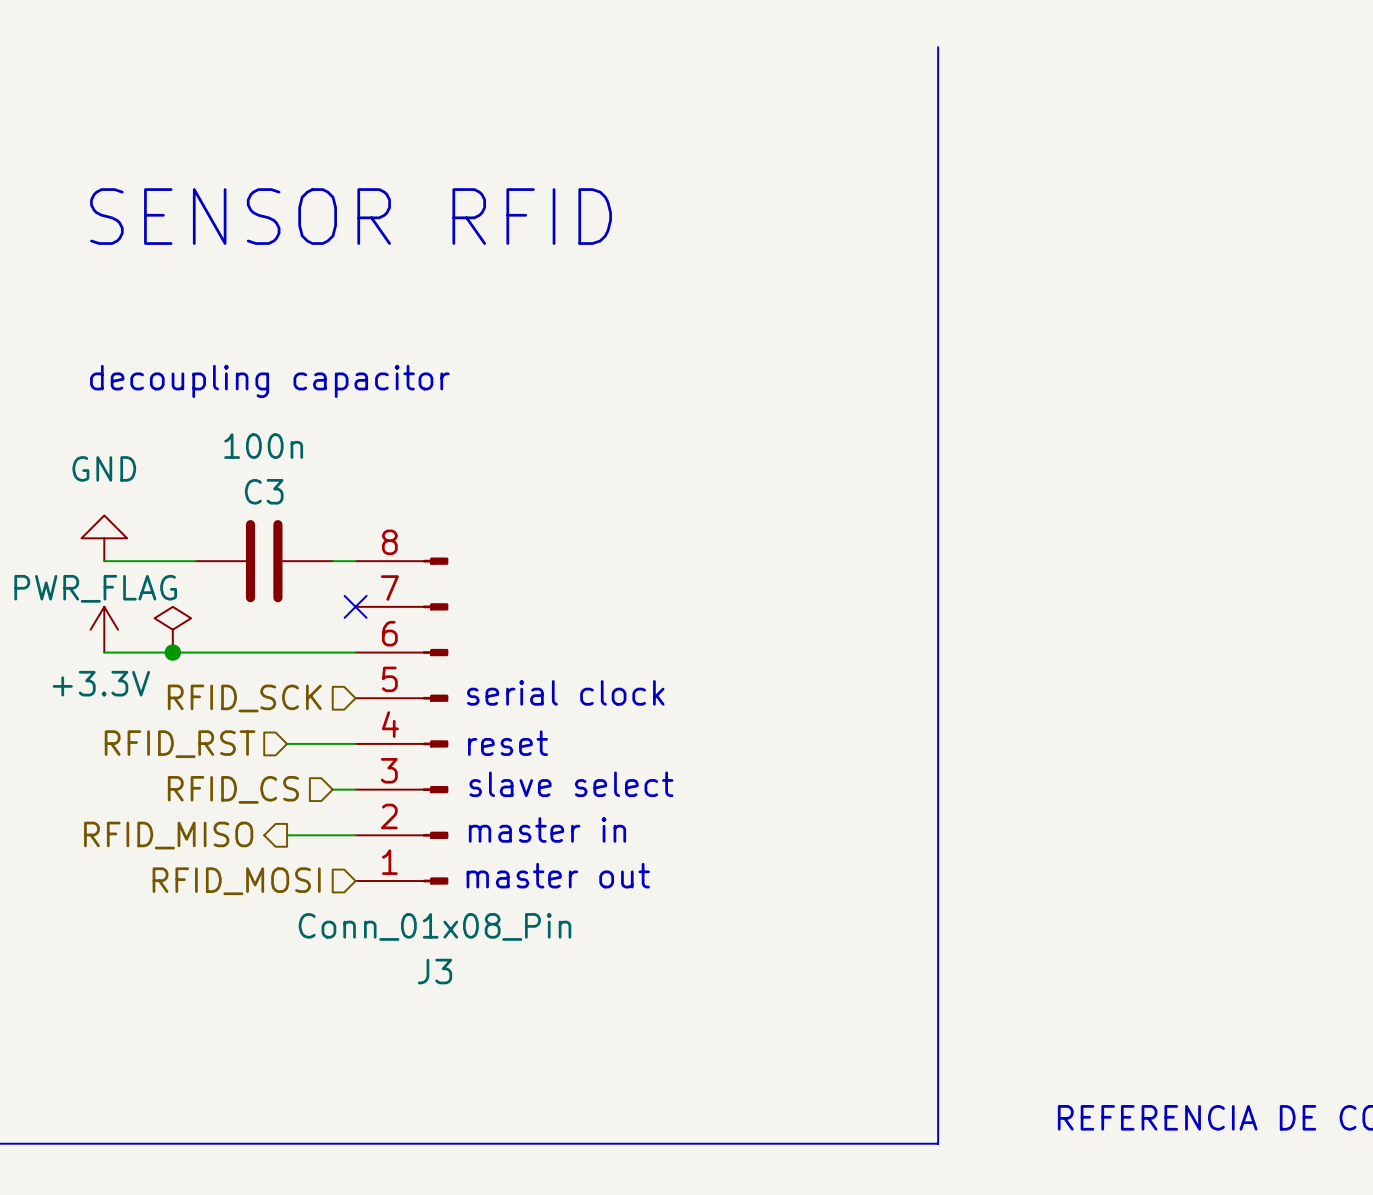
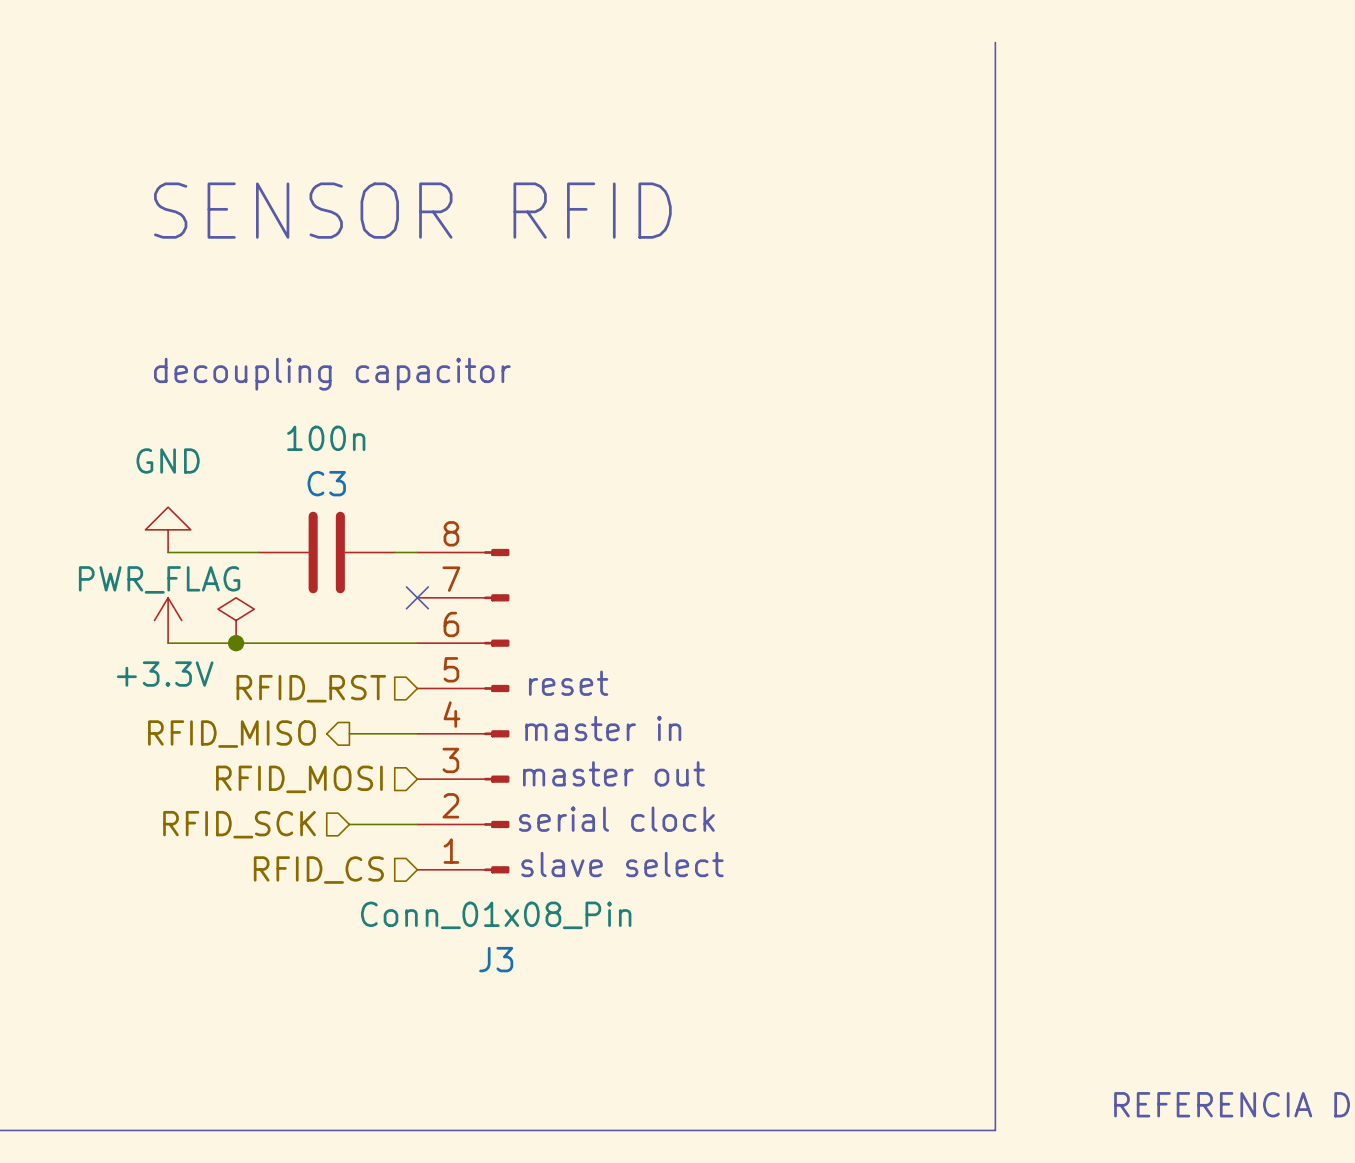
text position: serial clock (565, 692) -> serial clock (616, 819)
hierarchical label: RFID_SCK (244, 698) -> RFID_RST (311, 688)
text position: reset (508, 743) -> reset (568, 683)
hierarchical label shape: input (180, 744) -> output (231, 734)
hierarchical label: RFID_RST (180, 744) -> RFID_MISO (231, 734)
text position: slave select (571, 784) -> slave select (622, 864)
hierarchical label: RFID_CS (233, 789) -> RFID_MOSI (299, 779)
wire: (332, 789) (355, 789) -> none
text position: master in (547, 829) -> master in (603, 728)
hierarchical label shape: output (168, 835) -> input (239, 824)
hierarchical label: RFID_MISO (168, 835) -> RFID_SCK (239, 824)
text position: master out (558, 875) -> master out (613, 773)
hierarchical label: RFID_MOSI (236, 881) -> RFID_CS (318, 870)

